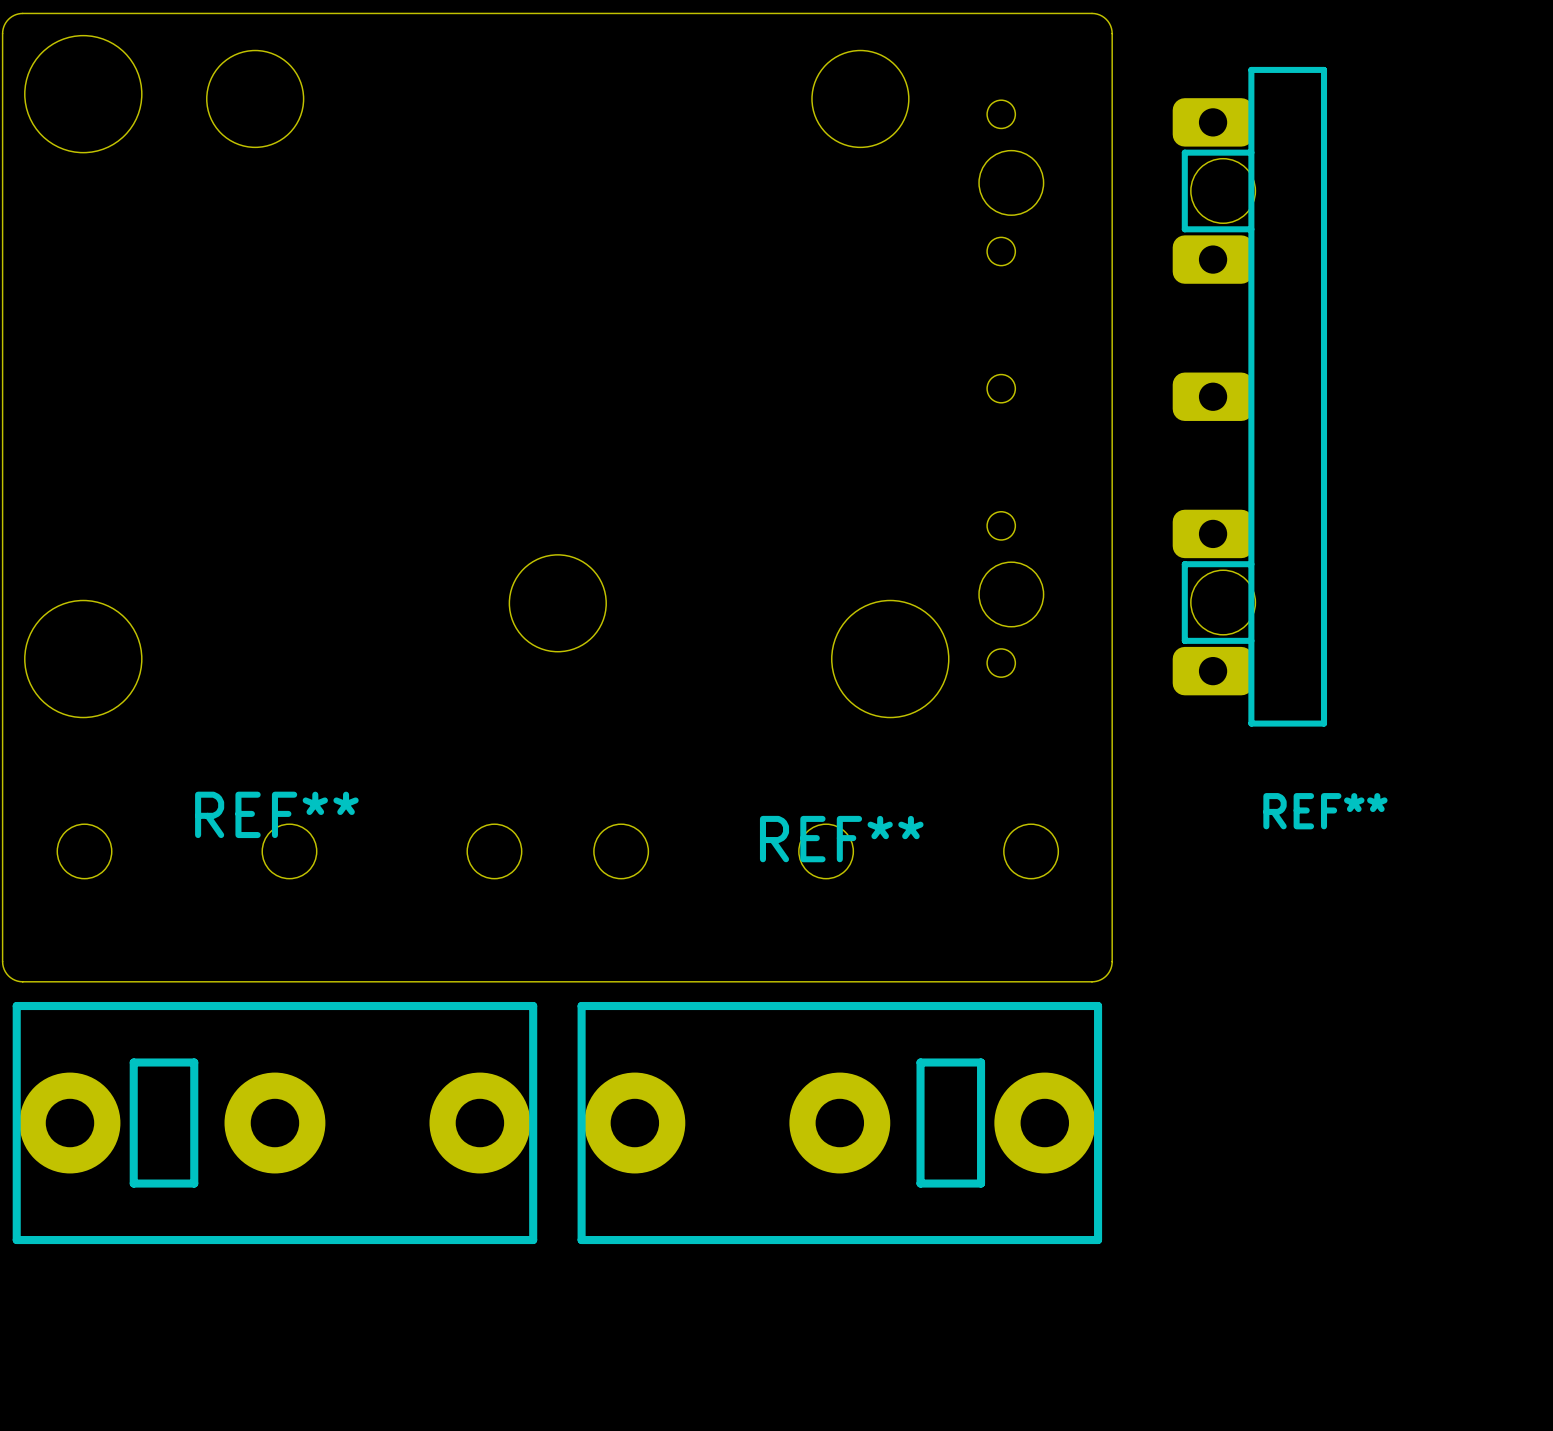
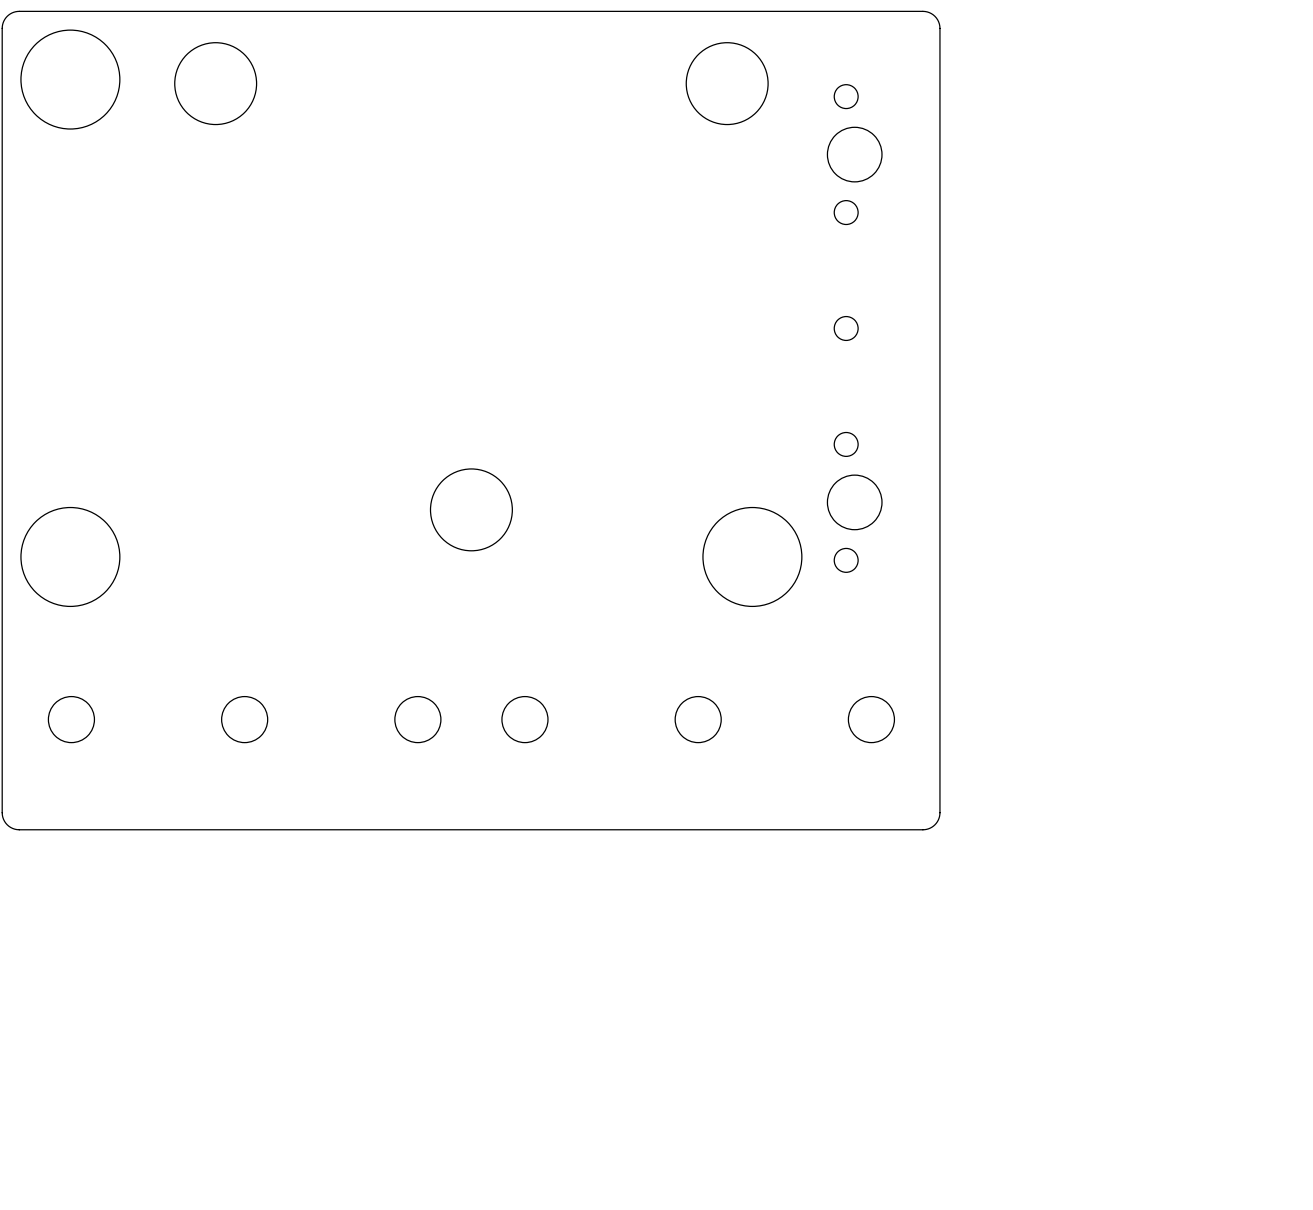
REF**: (1249, 396) -> none
REF**: (274, 1123) -> none
REF**: (839, 1123) -> none

